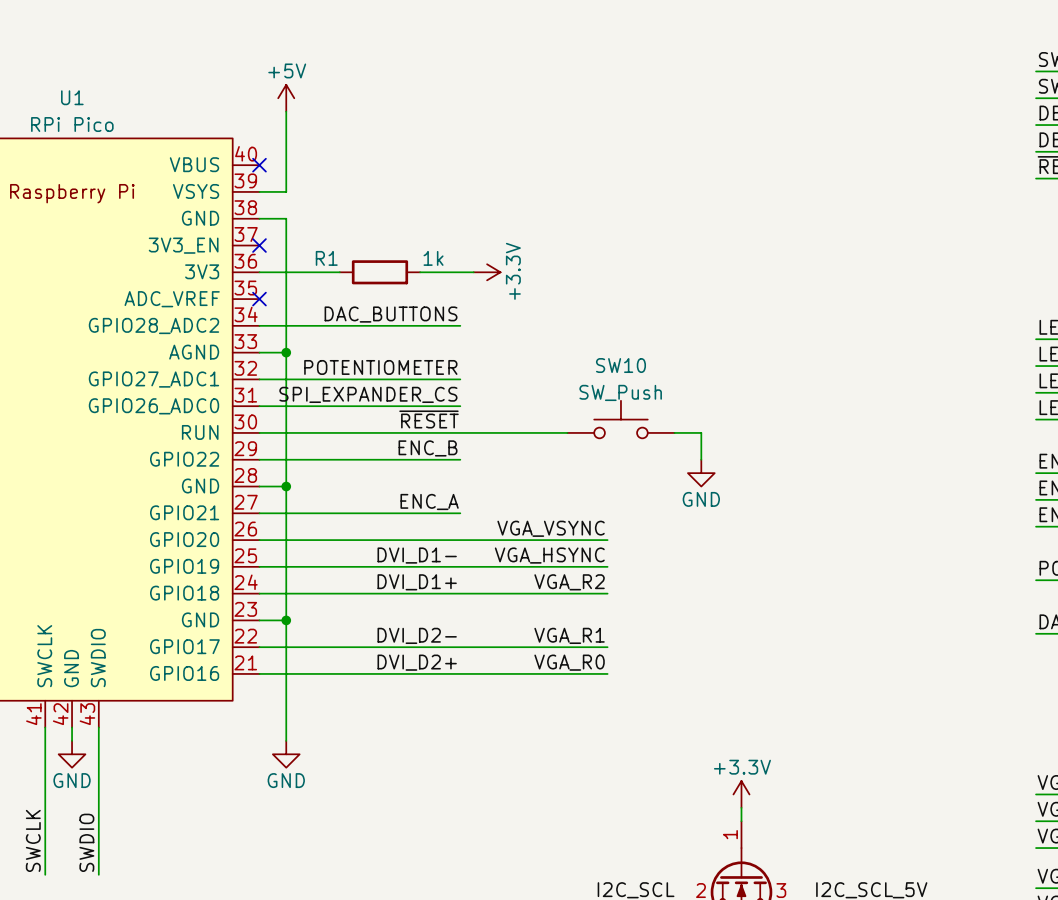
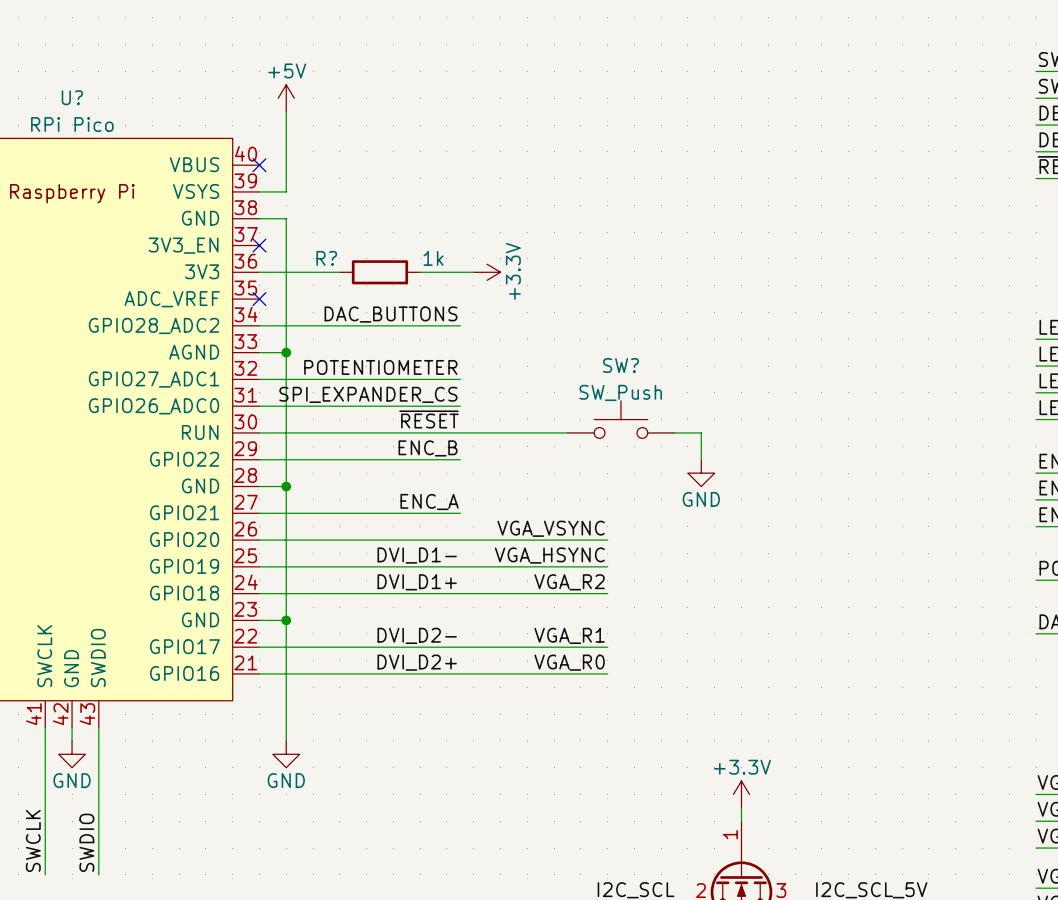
U1 name: U1 (72, 97) -> U? (72, 97)
R1 name: R1 (326, 258) -> R? (326, 258)
SW10 name: SW10 (620, 365) -> SW? (620, 365)

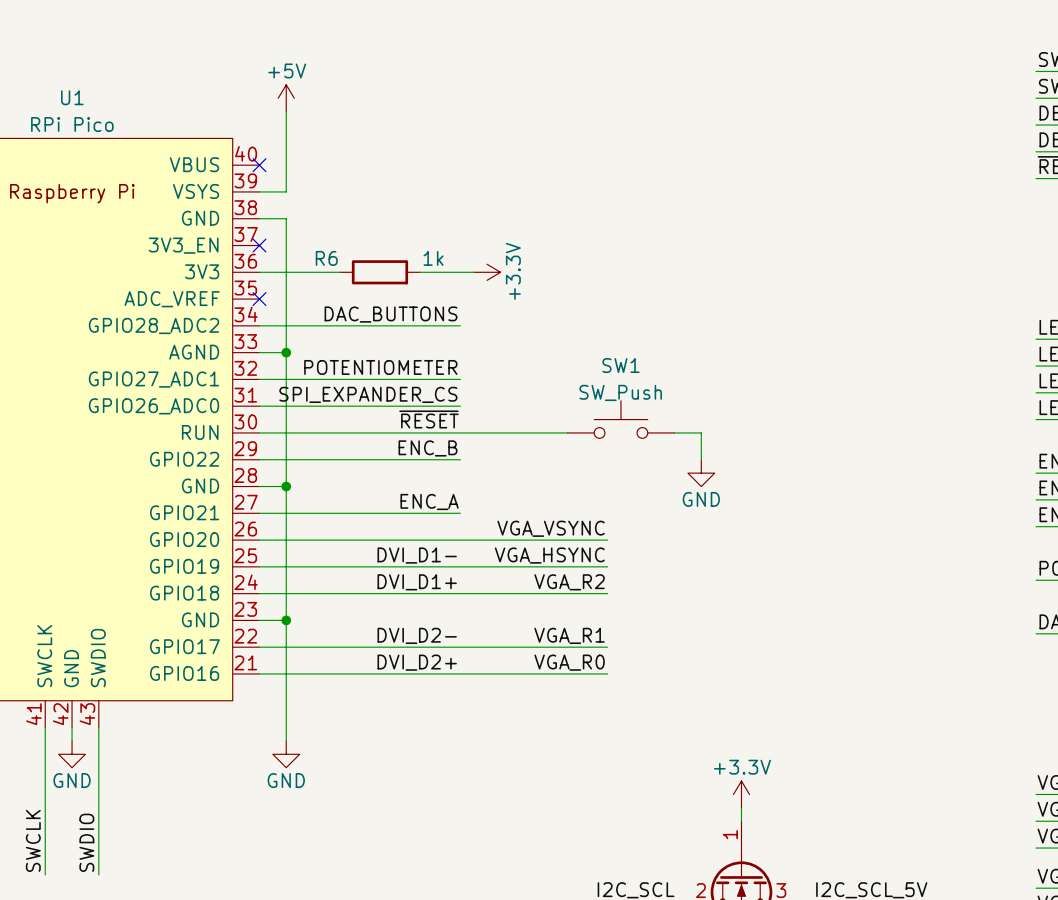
U? name: U? (72, 97) -> U1 (72, 97)
R? name: R? (326, 258) -> R6 (326, 258)
SW? name: SW? (620, 365) -> SW1 (620, 365)

